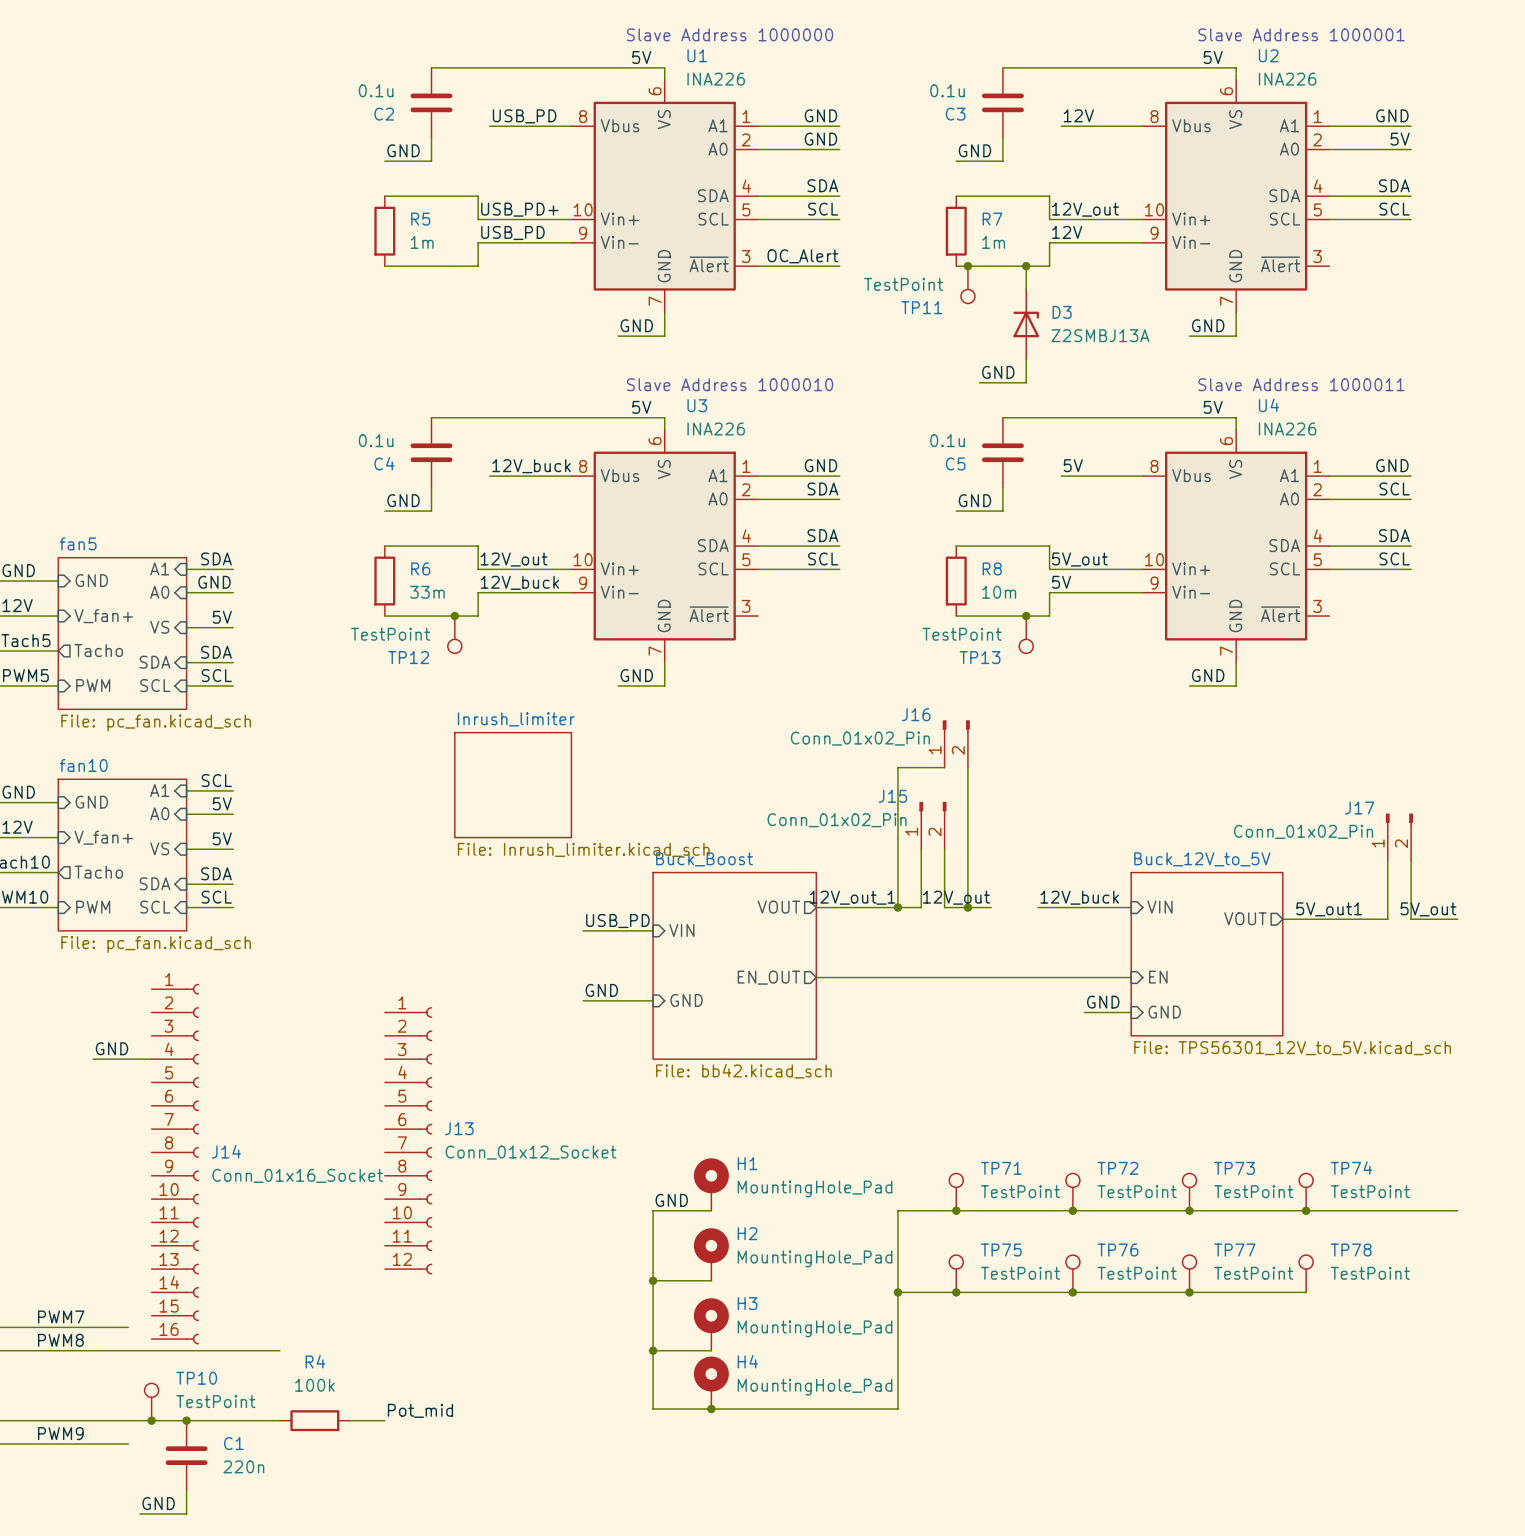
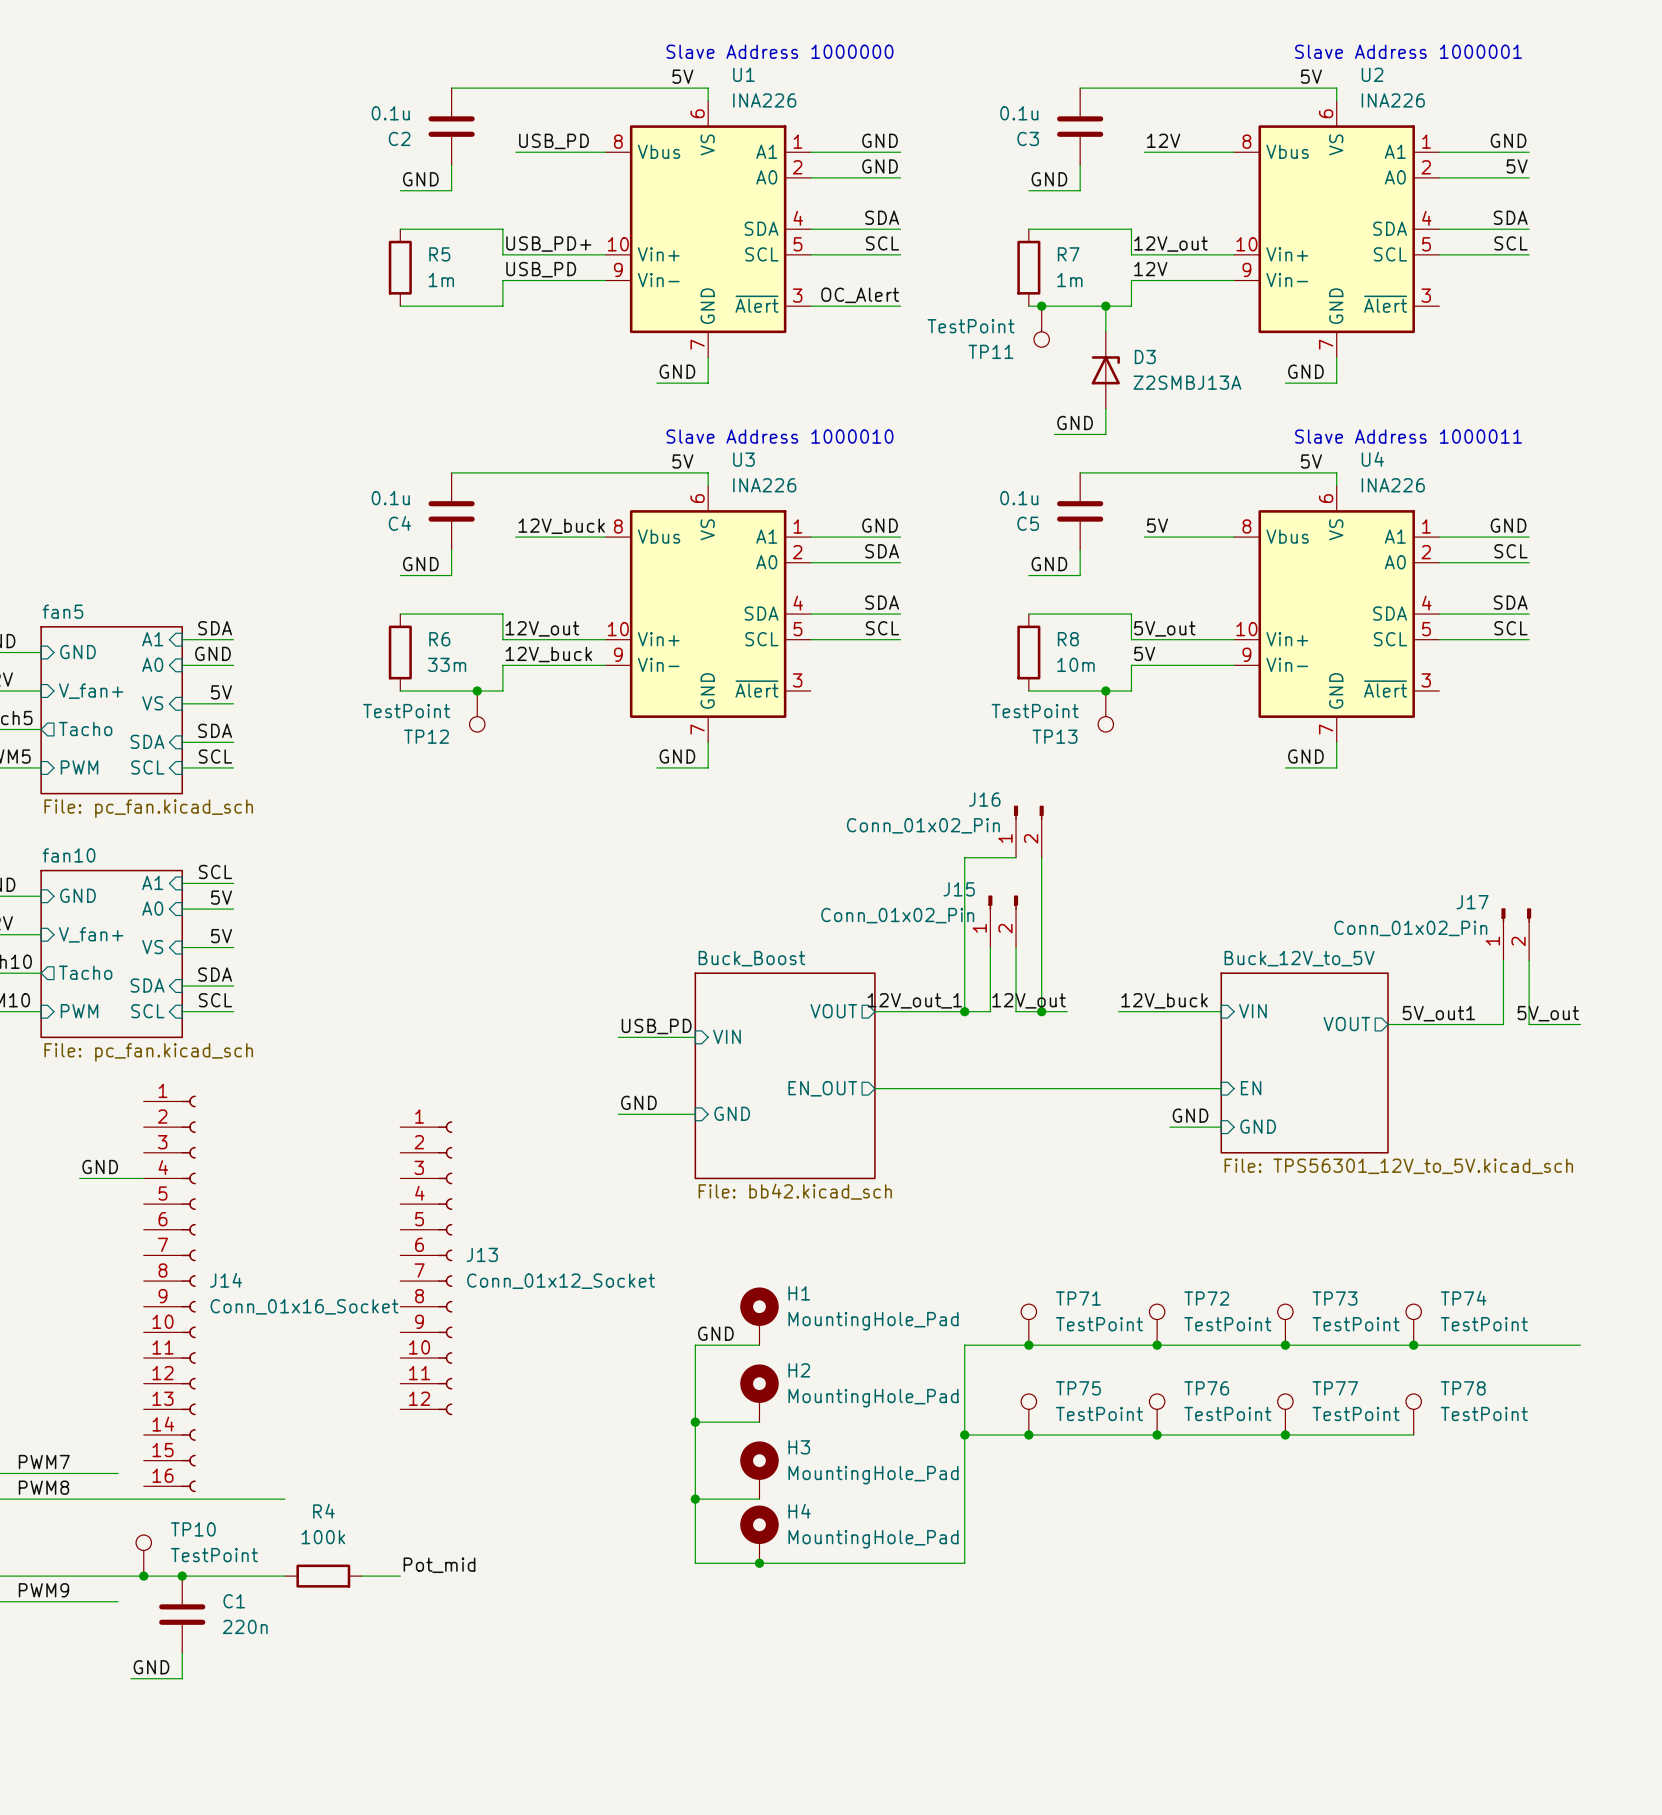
sheet Inrush_limiter: File: Inrush_limiter.kicad_sch (513, 785) -> none

